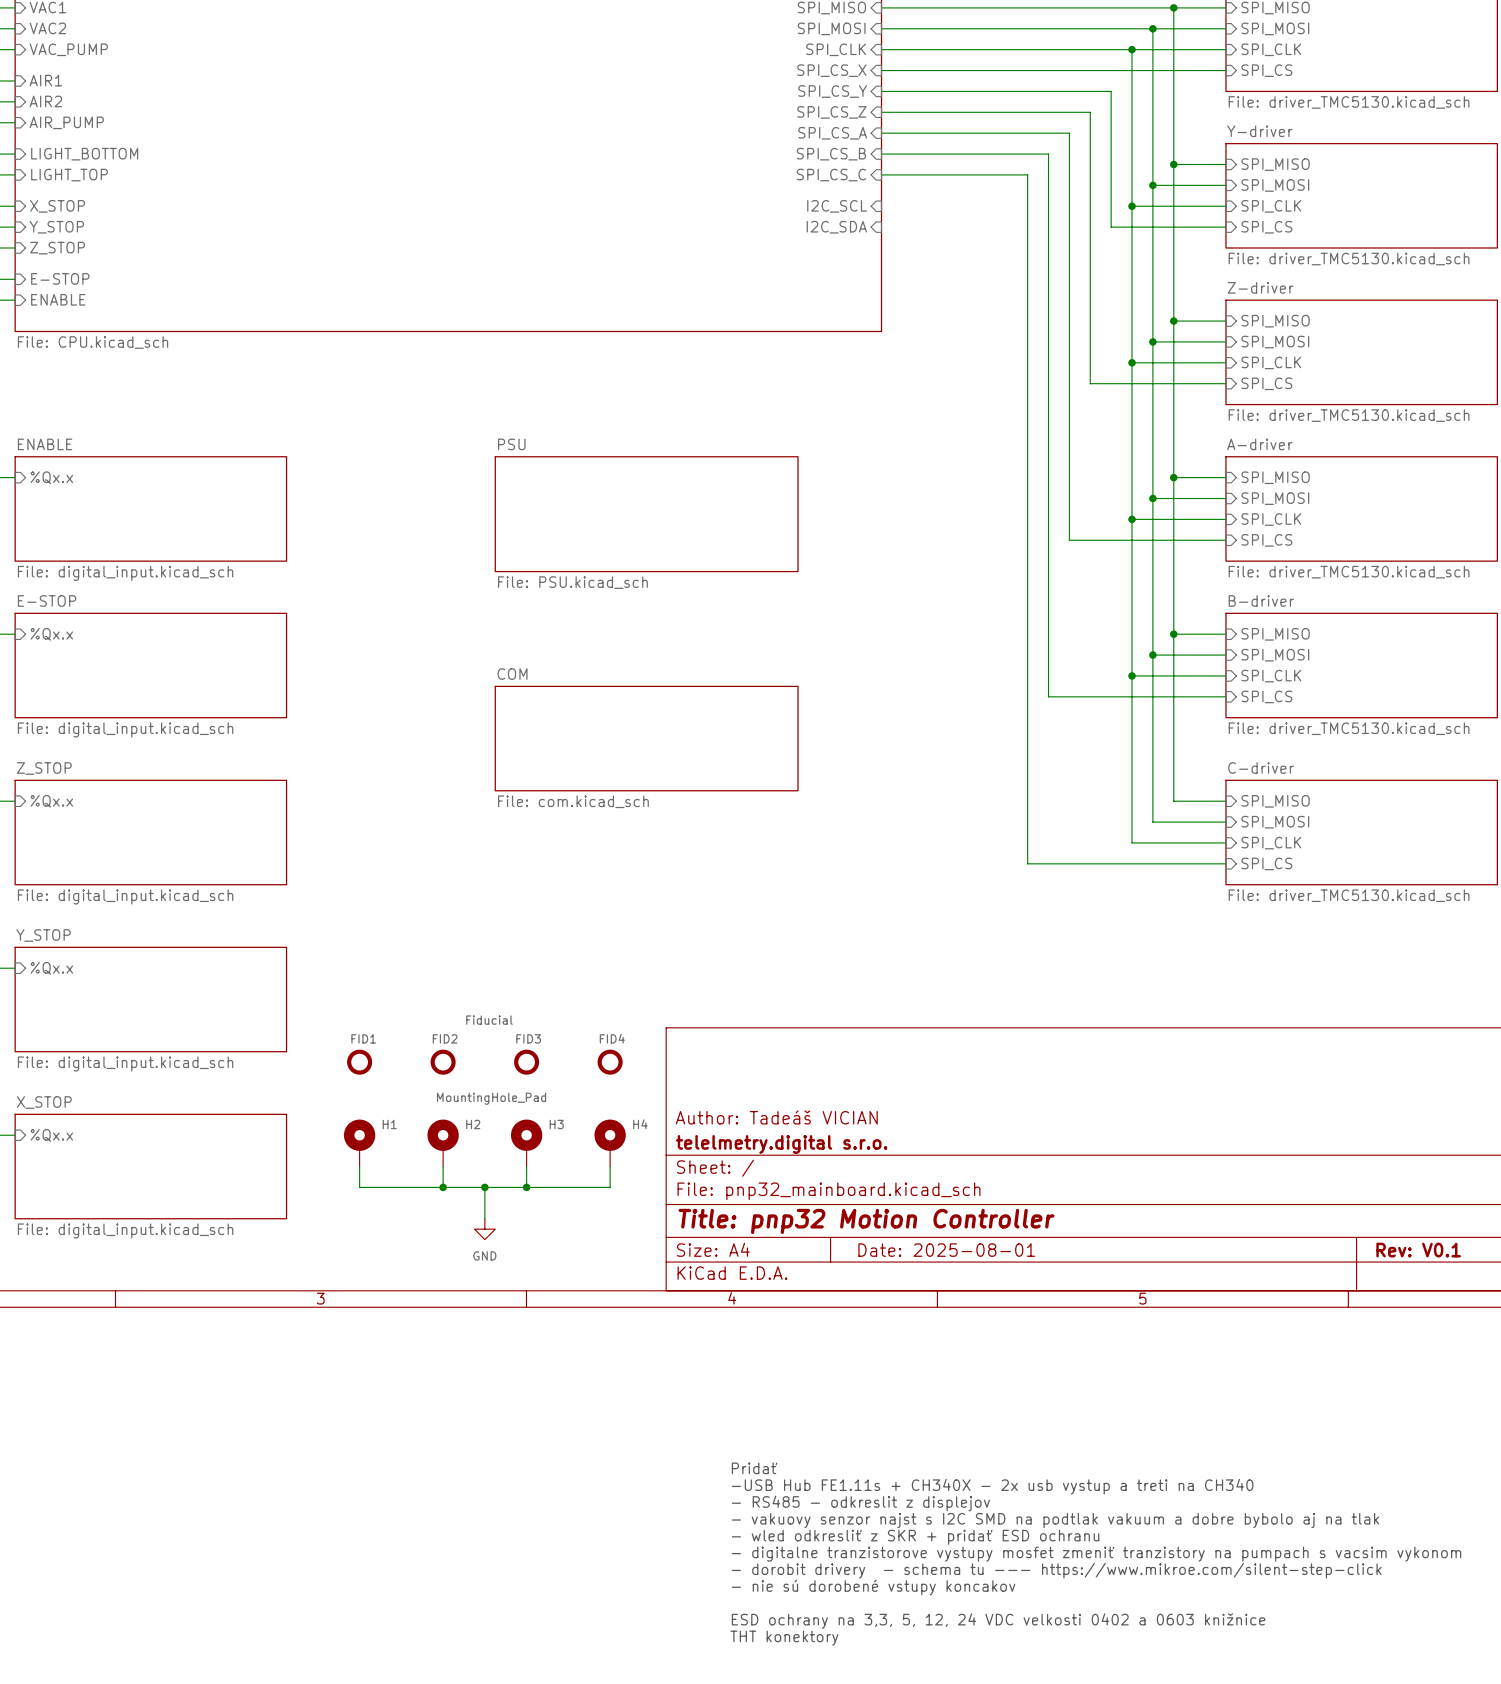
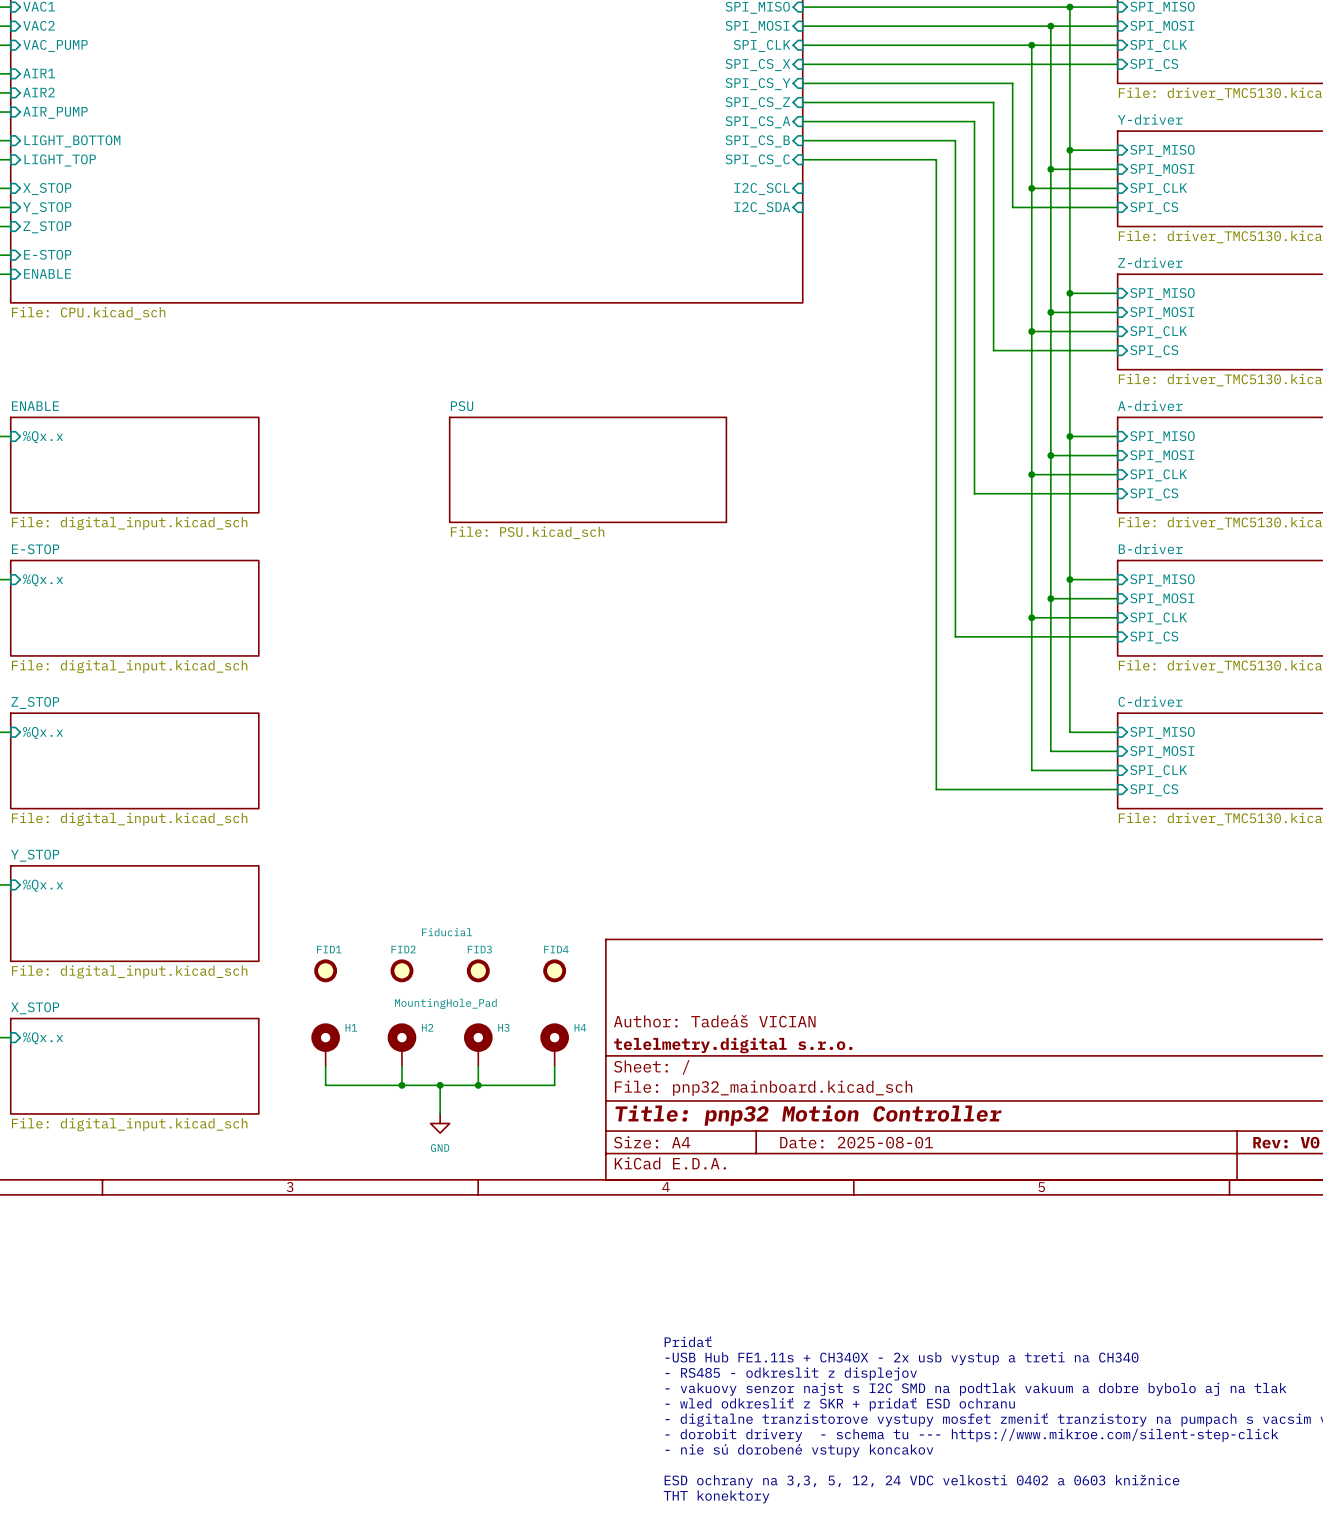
sheet COM: File: com.kicad_sch (646, 738) -> none

